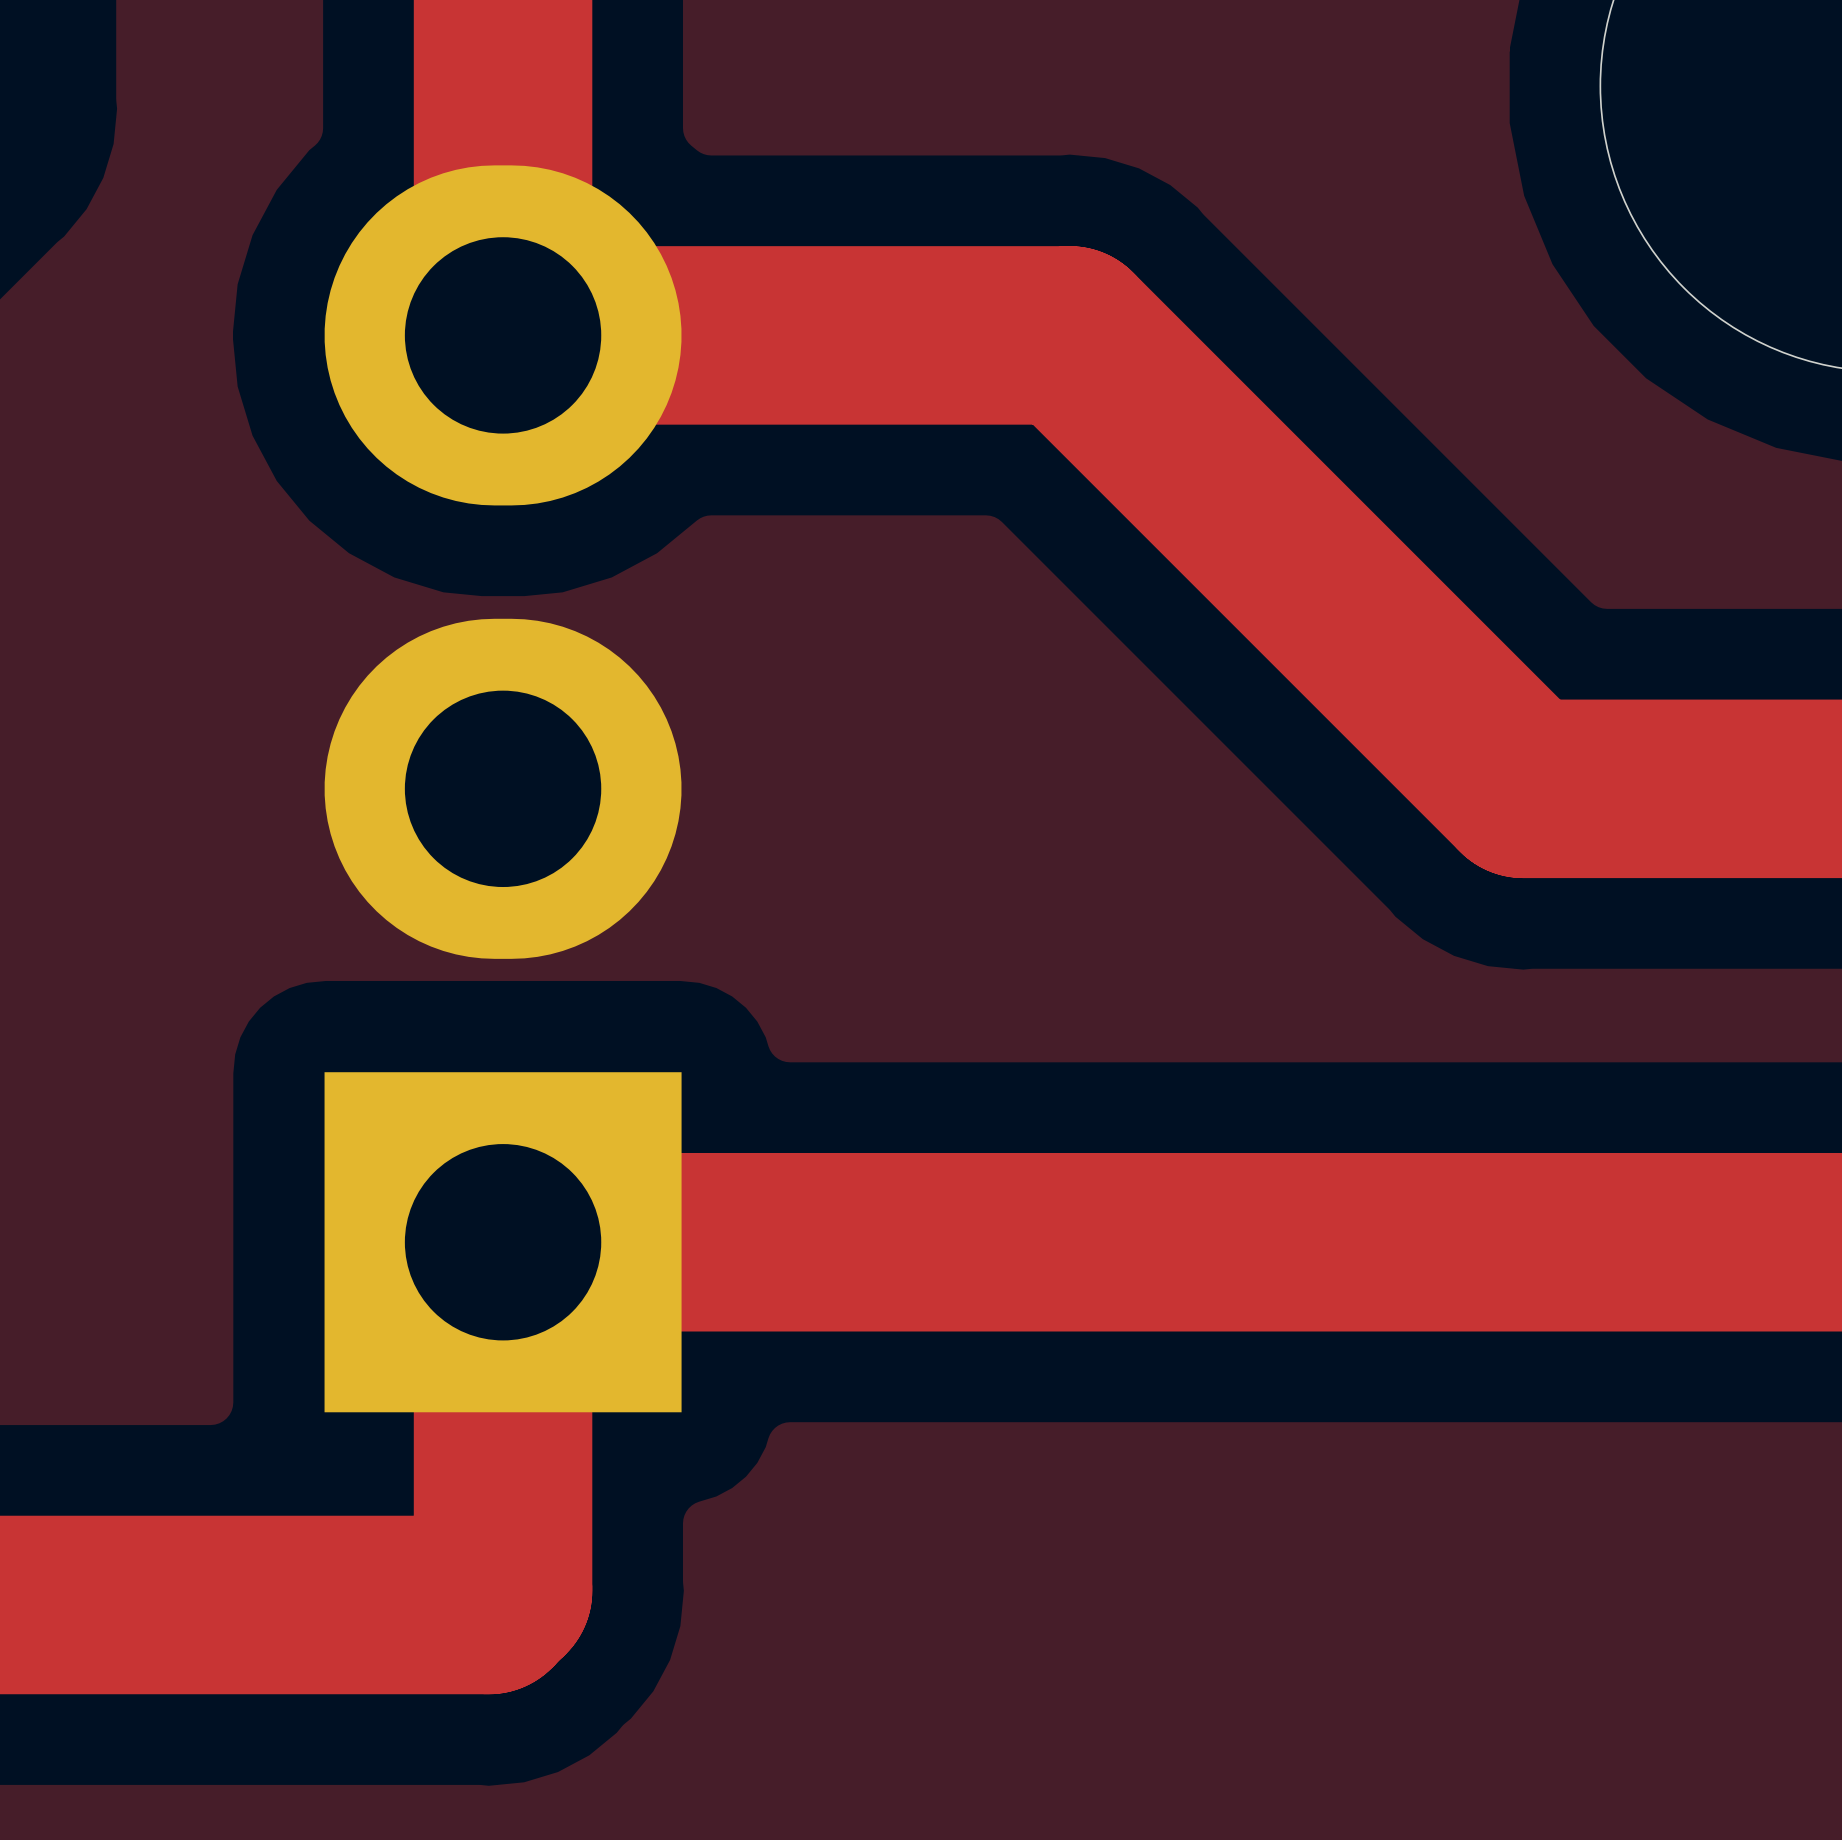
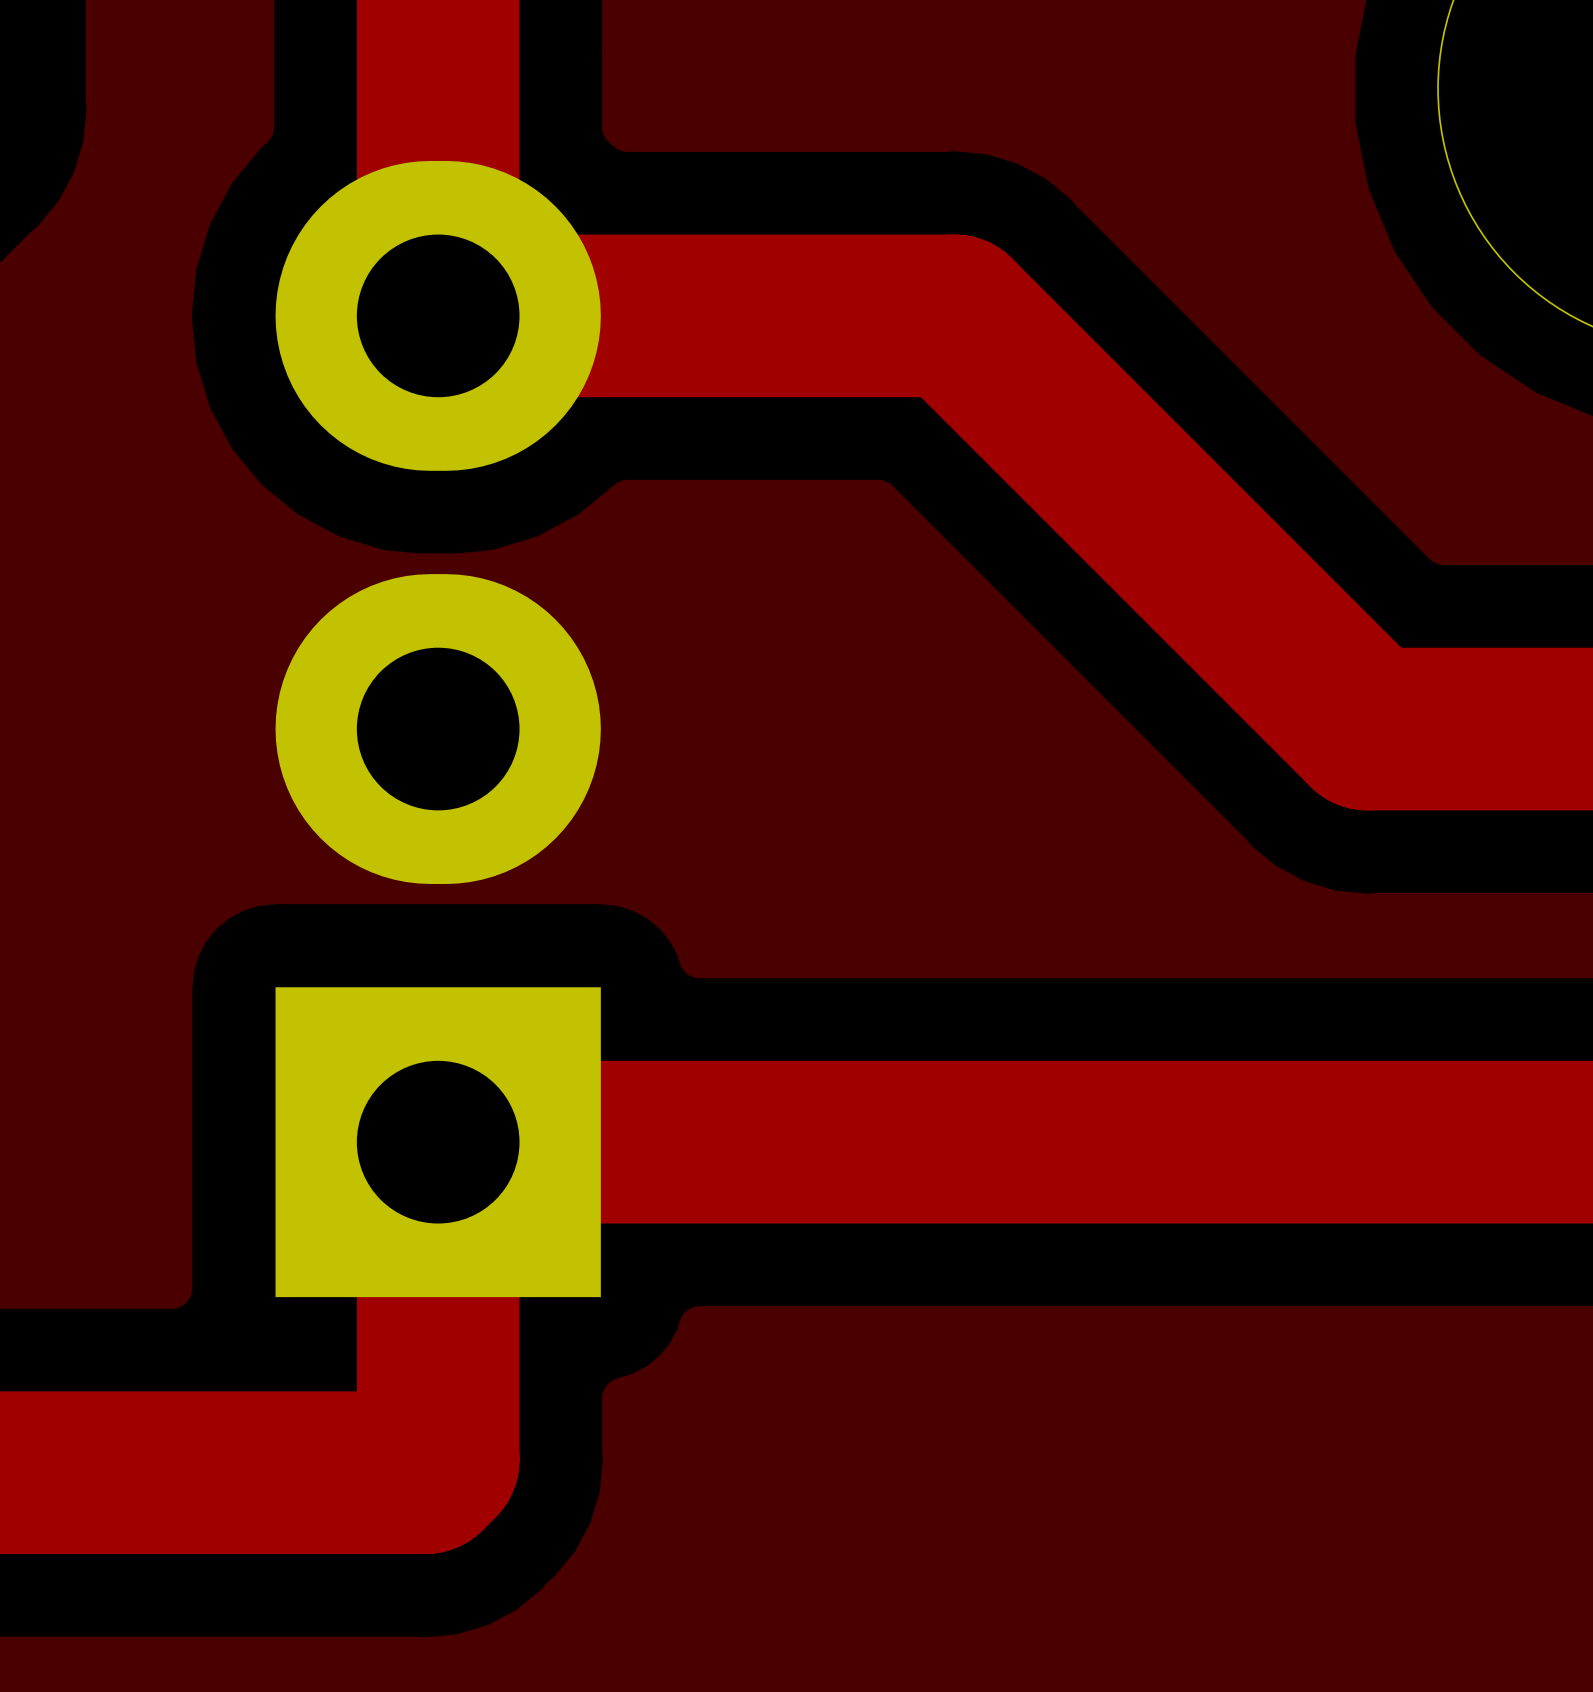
part footprint: [324, 165, 682, 1413] -> [275, 160, 601, 1298]

